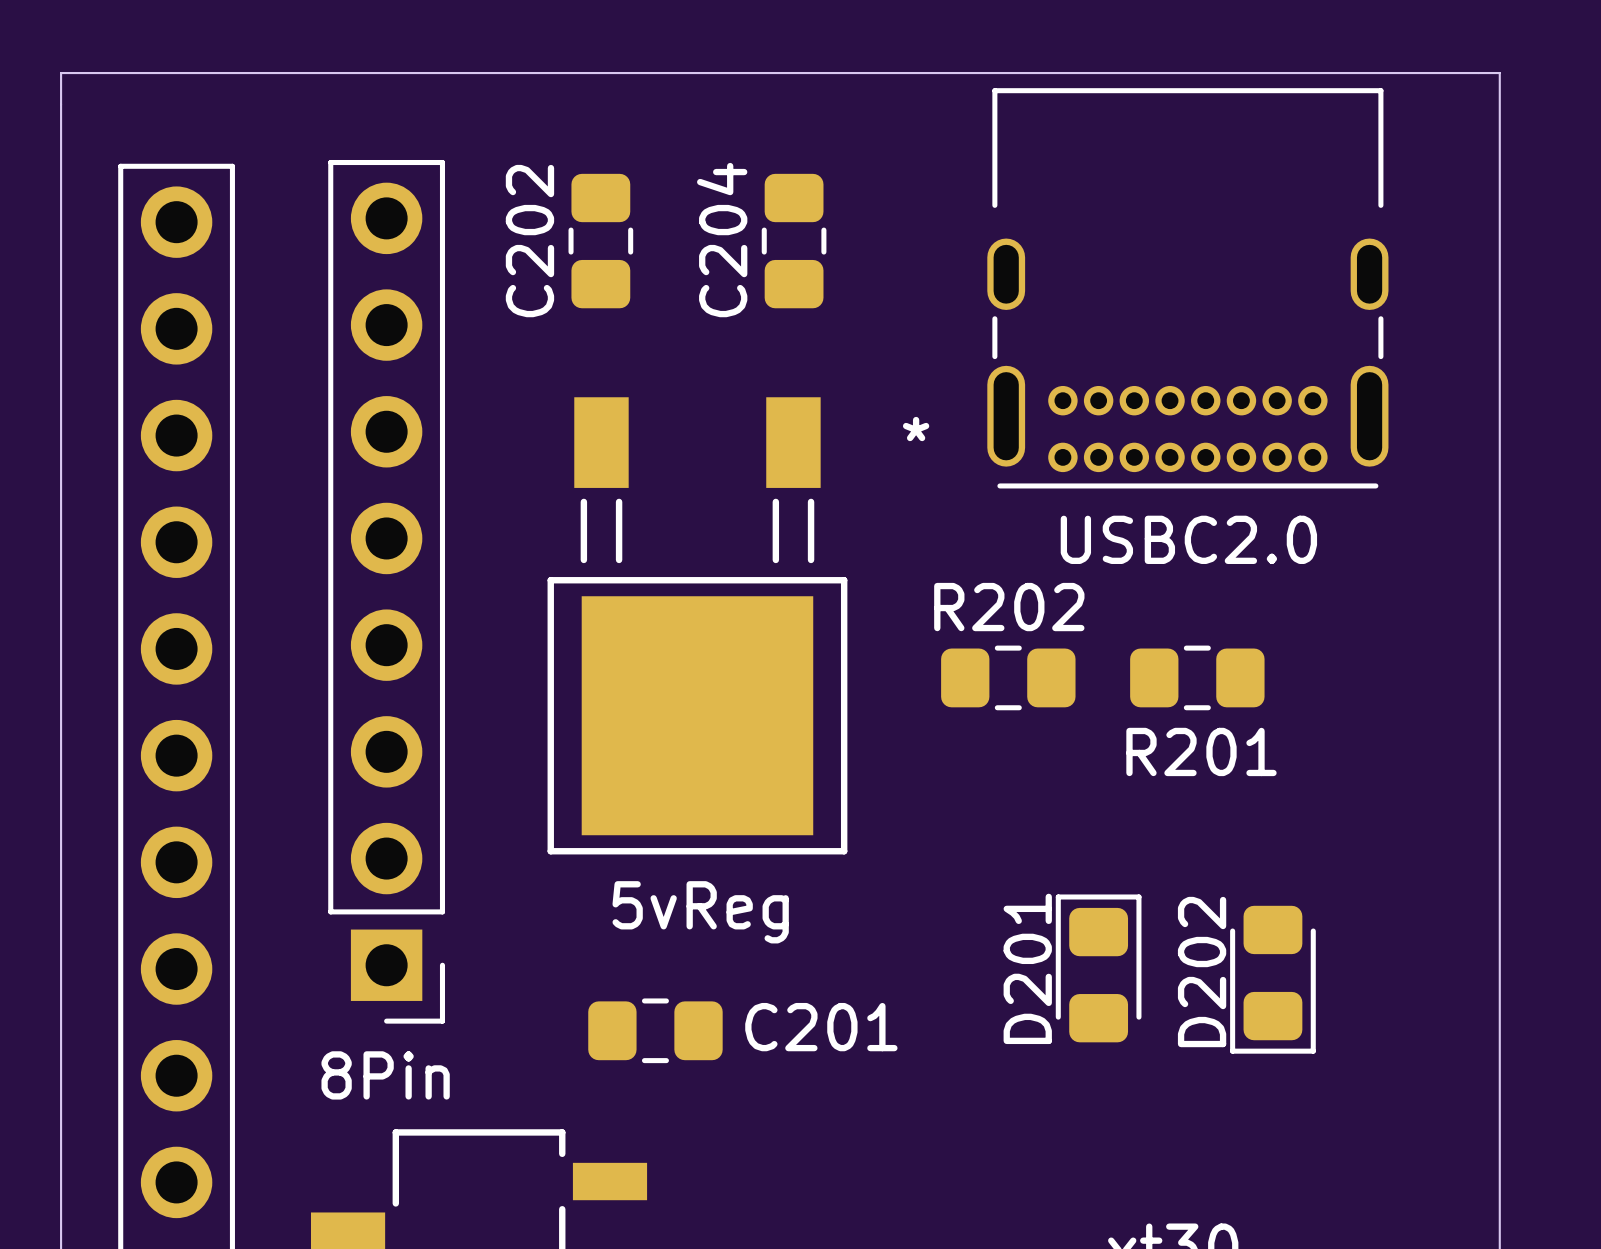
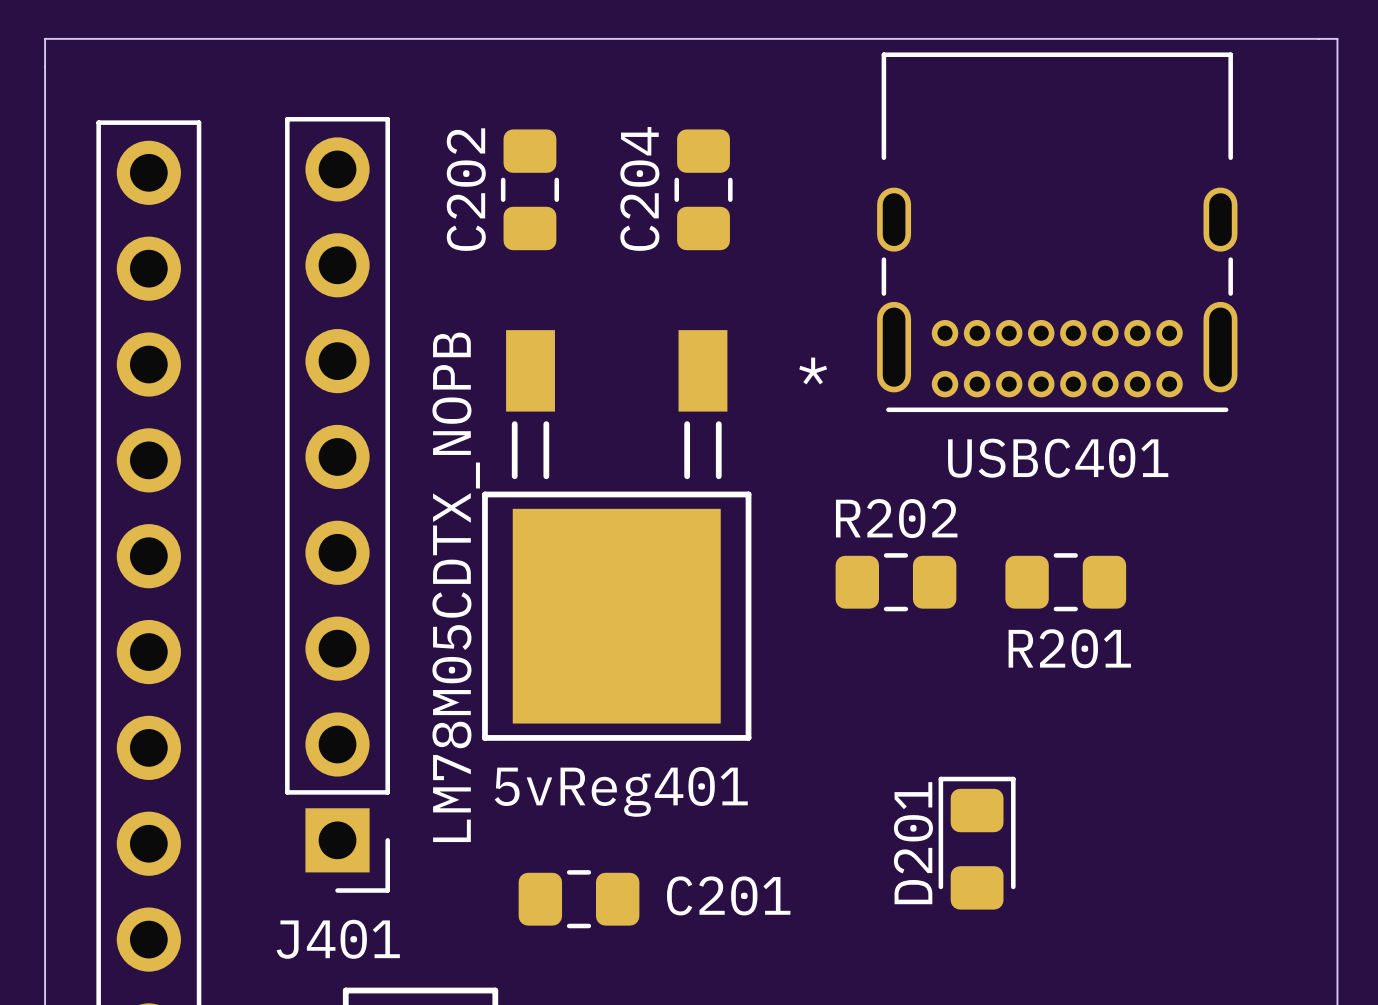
USBC2.0 name: USBC2.0 (1188, 539) -> USBC401 (1058, 458)
5vReg value: none -> LM78M05CDTX_NOPB (456, 587)
5vReg name: 5vReg (700, 912) -> 5vReg401 (621, 791)
D202: (1272, 979) -> none
8Pin name: 8Pin (385, 1075) -> J401 (338, 939)

